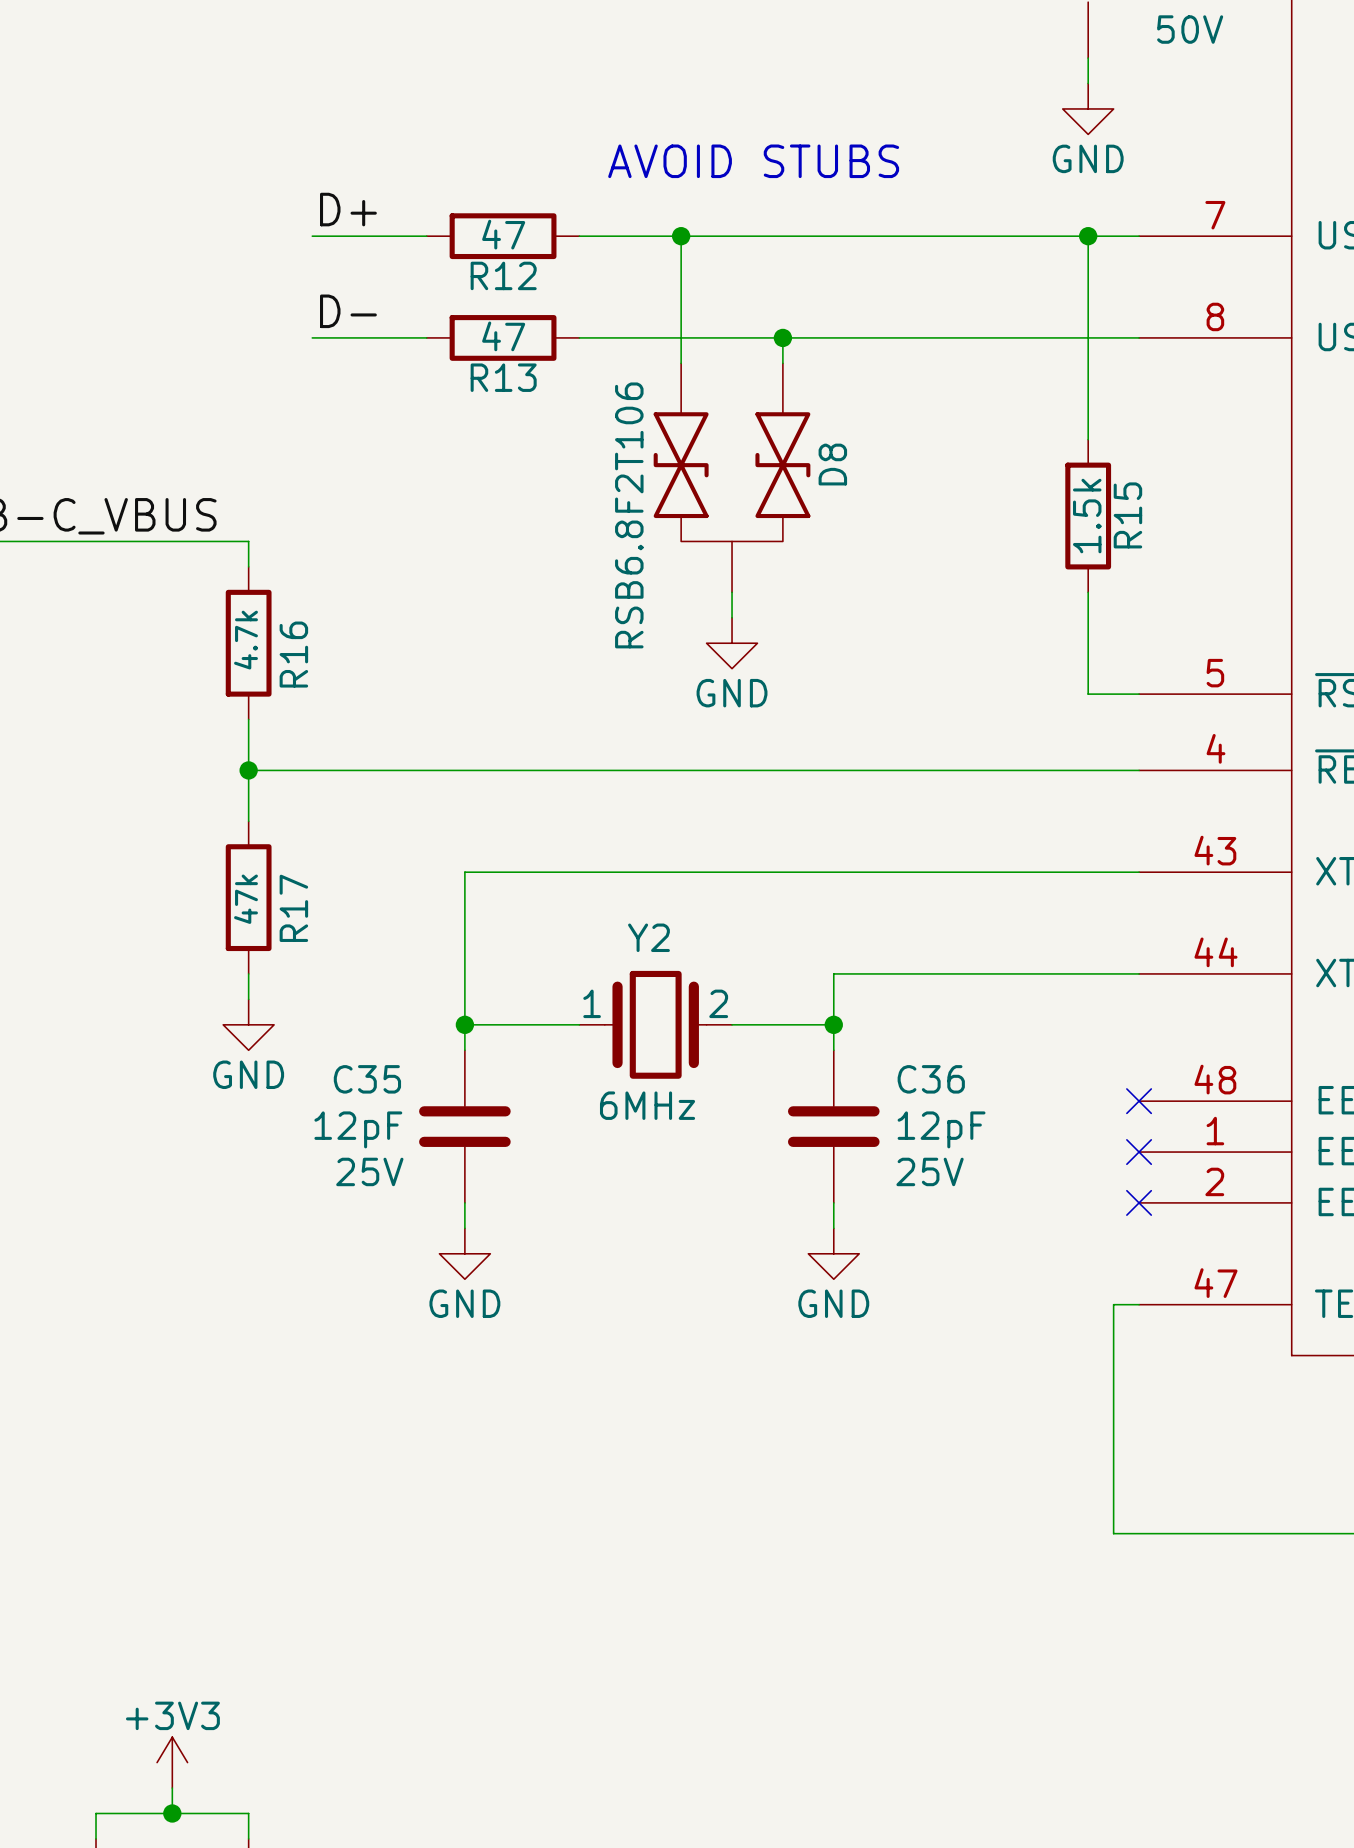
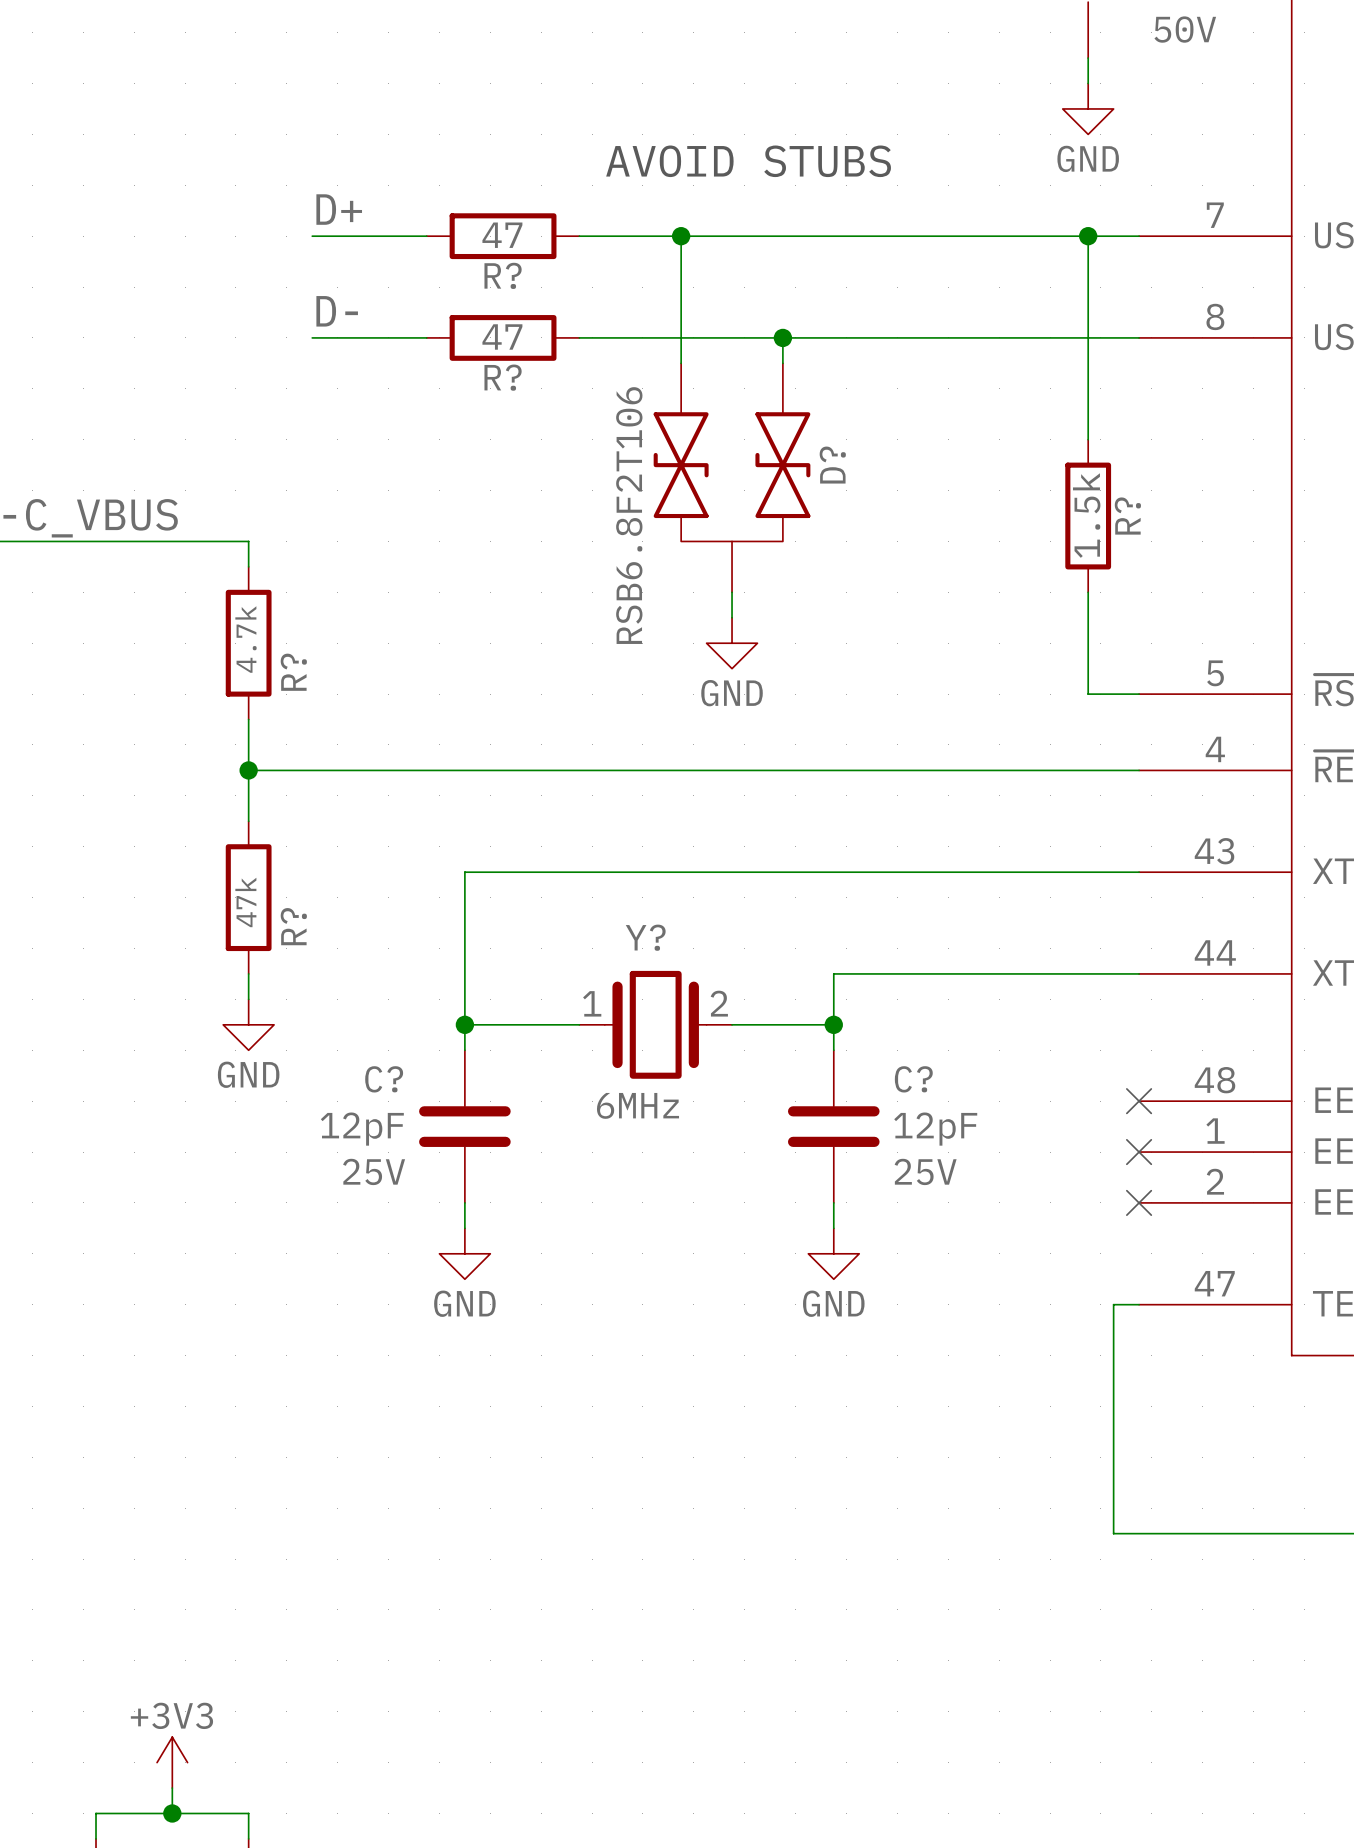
R12 name: R12 (503, 275) -> R? (503, 275)
R13 name: R13 (503, 377) -> R? (503, 377)
D8 name: D8 (832, 464) -> D? (832, 465)
R15 name: R15 (1127, 515) -> R? (1127, 516)
R16 name: R16 (293, 654) -> R? (293, 672)
R17 name: R17 (293, 908) -> R? (293, 926)
Y2 name: Y2 (648, 937) -> Y? (645, 937)
C35 name: C35 (367, 1079) -> C? (384, 1079)
C36 name: C36 (931, 1079) -> C? (913, 1079)

